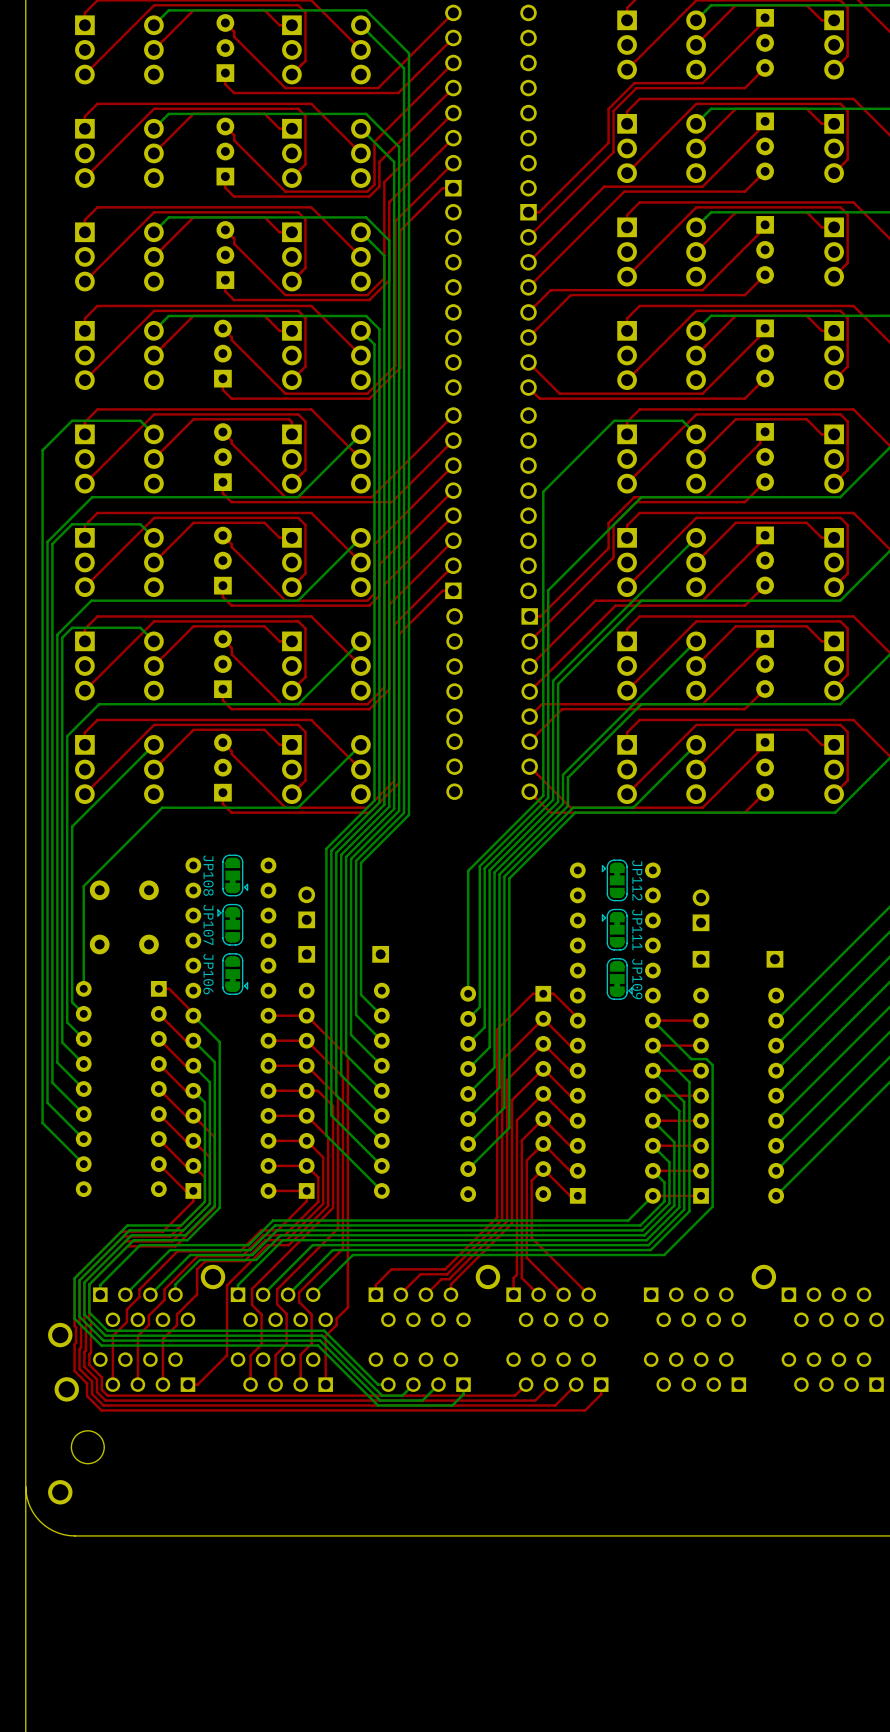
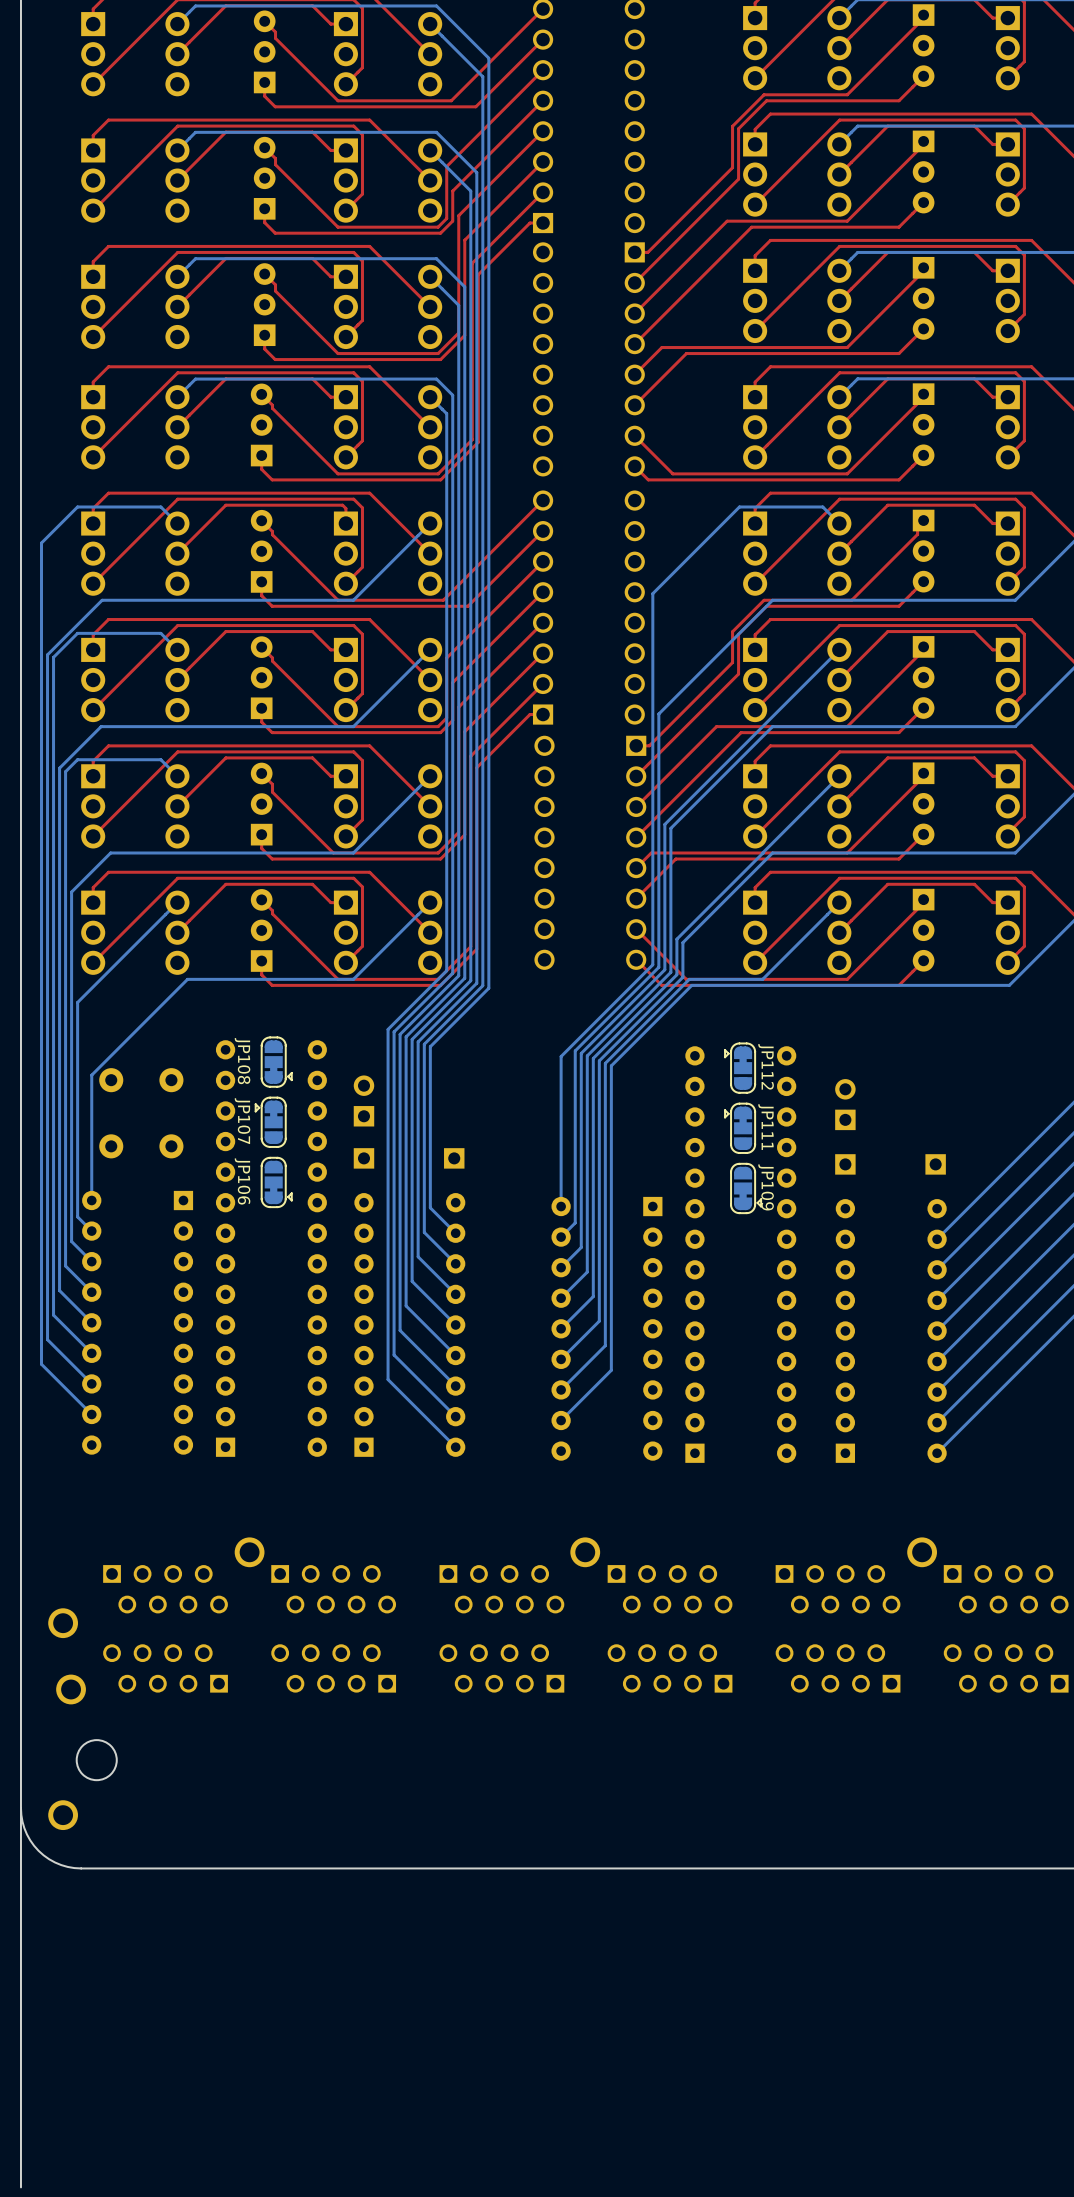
top track: (158, 988) (169, 988) (193, 1013) (193, 1015) -> none
top track: (158, 1013) (185, 1040) (193, 1040) -> none
bottom track: (193, 1015) (219, 1042) (219, 1207) (187, 1240) (133, 1240) (89, 1284) (89, 1312) (107, 1330) (324, 1330) (378, 1384) (388, 1384) -> none
top track: (268, 1015) (306, 1015) (347, 1056) (347, 1307) (336, 1318) (336, 1325) (325, 1336) (325, 1384) -> none
top track: (577, 1020) (577, 1017) (553, 993) (532, 993) (497, 1029) (497, 1217) (445, 1269) (391, 1269) (375, 1284) (375, 1294) -> none
bottom track: (652, 1020) (691, 1059) (706, 1059) (712, 1065) (712, 1206) (664, 1255) (352, 1255) (313, 1294) -> none
top track: (701, 1020) (652, 1020) -> none
top track: (158, 1038) (185, 1065) (193, 1065) -> none
bottom track: (193, 1040) (214, 1062) (214, 1205) (185, 1235) (131, 1235) (84, 1282) (84, 1314) (105, 1335) (322, 1335) (382, 1395) (402, 1395) (413, 1384) -> none
top track: (268, 1040) (306, 1040) (342, 1076) (342, 1248) (299, 1292) (299, 1301) (311, 1314) (311, 1343) (300, 1354) (300, 1384) -> none
top track: (577, 1045) (570, 1045) (543, 1018) (502, 1059) (502, 1219) (447, 1274) (420, 1274) (400, 1294) -> none
bottom track: (652, 1045) (689, 1082) (689, 1211) (650, 1250) (332, 1250) (288, 1294) -> none
top track: (701, 1045) (652, 1045) -> none
top track: (158, 1063) (185, 1090) (193, 1090) -> none
bottom track: (193, 1065) (209, 1082) (209, 1203) (183, 1230) (129, 1230) (79, 1280) (79, 1316) (103, 1340) (320, 1340) (380, 1400) (422, 1400) (438, 1384) -> none
top track: (268, 1065) (306, 1065) (338, 1097) (338, 1228) (277, 1289) (277, 1304) (286, 1313) (286, 1344) (275, 1355) (275, 1384) -> none
top track: (577, 1070) (570, 1070) (543, 1043) (507, 1080) (507, 1221) (449, 1279) (441, 1279) (425, 1294) -> none
bottom track: (652, 1070) (684, 1101) (684, 1209) (648, 1245) (312, 1245) (263, 1294) -> none
top track: (701, 1070) (652, 1070) -> none
top track: (158, 1089) (185, 1115) (193, 1115) (214, 1137) (214, 1207) (175, 1246) (127, 1246) (89, 1284) (89, 1319) (90, 1321) (89, 1364) (101, 1377) (101, 1389) (107, 1395) (515, 1395) (526, 1384) -> none
bottom track: (193, 1090) (204, 1102) (204, 1201) (181, 1225) (127, 1225) (74, 1278) (74, 1318) (101, 1345) (318, 1345) (378, 1405) (452, 1405) (463, 1394) (463, 1384) -> none
top track: (268, 1090) (317, 1090) (333, 1106) (333, 1207) (252, 1288) (252, 1305) (261, 1314) (261, 1344) (250, 1355) (250, 1384) -> none
top track: (577, 1095) (570, 1095) (543, 1068) (512, 1100) (512, 1223) (450, 1284) (450, 1294) -> none
bottom track: (652, 1095) (664, 1095) (679, 1110) (679, 1207) (646, 1240) (282, 1240) (238, 1284) (238, 1294) -> none
top track: (701, 1095) (652, 1095) -> none
top track: (158, 1114) (185, 1140) (193, 1140) (209, 1157) (209, 1203) (172, 1241) (125, 1241) (84, 1282) (84, 1321) (86, 1323) (84, 1366) (96, 1379) (96, 1391) (105, 1400) (535, 1400) (551, 1384) -> none
top track: (268, 1115) (306, 1115) (328, 1137) (328, 1205) (288, 1245) (267, 1245) (227, 1285) (227, 1355) (197, 1384) (187, 1384) -> none
top track: (577, 1120) (570, 1120) (543, 1093) (516, 1120) (516, 1274) (513, 1278) (513, 1294) -> none
bottom track: (652, 1120) (674, 1142) (674, 1205) (644, 1235) (280, 1235) (256, 1259) (199, 1259) (175, 1284) (175, 1294) -> none
top track: (701, 1120) (652, 1120) -> none
top track: (158, 1139) (185, 1165) (193, 1165) (204, 1177) (204, 1201) (170, 1236) (123, 1236) (79, 1280) (79, 1323) (81, 1325) (79, 1368) (92, 1381) (92, 1394) (103, 1405) (555, 1405) (576, 1384) -> none
top track: (268, 1140) (306, 1140) (323, 1157) (323, 1203) (286, 1240) (265, 1240) (244, 1261) (205, 1261) (197, 1269) (197, 1294) (176, 1314) (176, 1325) (162, 1339) (162, 1384) -> none
top track: (577, 1145) (570, 1145) (543, 1118) (521, 1140) (521, 1277) (538, 1294) -> none
bottom track: (652, 1145) (669, 1162) (669, 1203) (642, 1230) (277, 1230) (252, 1255) (190, 1255) (150, 1294) -> none
top track: (701, 1145) (652, 1145) -> none
top track: (158, 1164) (185, 1190) (193, 1190) (193, 1201) (163, 1231) (121, 1231) (74, 1278) (74, 1325) (76, 1327) (74, 1371) (87, 1383) (87, 1396) (101, 1410) (585, 1410) (601, 1394) (601, 1384) -> none
top track: (268, 1165) (306, 1165) (318, 1177) (318, 1201) (284, 1235) (263, 1235) (242, 1256) (197, 1256) (164, 1289) (164, 1300) (148, 1315) (148, 1325) (137, 1336) (137, 1384) -> none
top track: (577, 1170) (570, 1170) (543, 1144) (526, 1160) (526, 1257) (563, 1294) -> none
bottom track: (652, 1170) (664, 1182) (664, 1201) (640, 1225) (275, 1225) (250, 1250) (170, 1250) (125, 1294) -> none
top track: (701, 1170) (652, 1170) -> none
top track: (268, 1190) (306, 1190) (306, 1201) (277, 1230) (261, 1230) (240, 1251) (177, 1251) (139, 1289) (139, 1296) (126, 1309) (126, 1321) (112, 1336) (112, 1384) -> none
top track: (577, 1195) (570, 1195) (543, 1169) (531, 1180) (531, 1237) (588, 1294) -> none
bottom track: (652, 1195) (628, 1220) (273, 1220) (248, 1245) (140, 1245) (100, 1284) (100, 1294) -> none
top track: (701, 1195) (652, 1195) -> none

